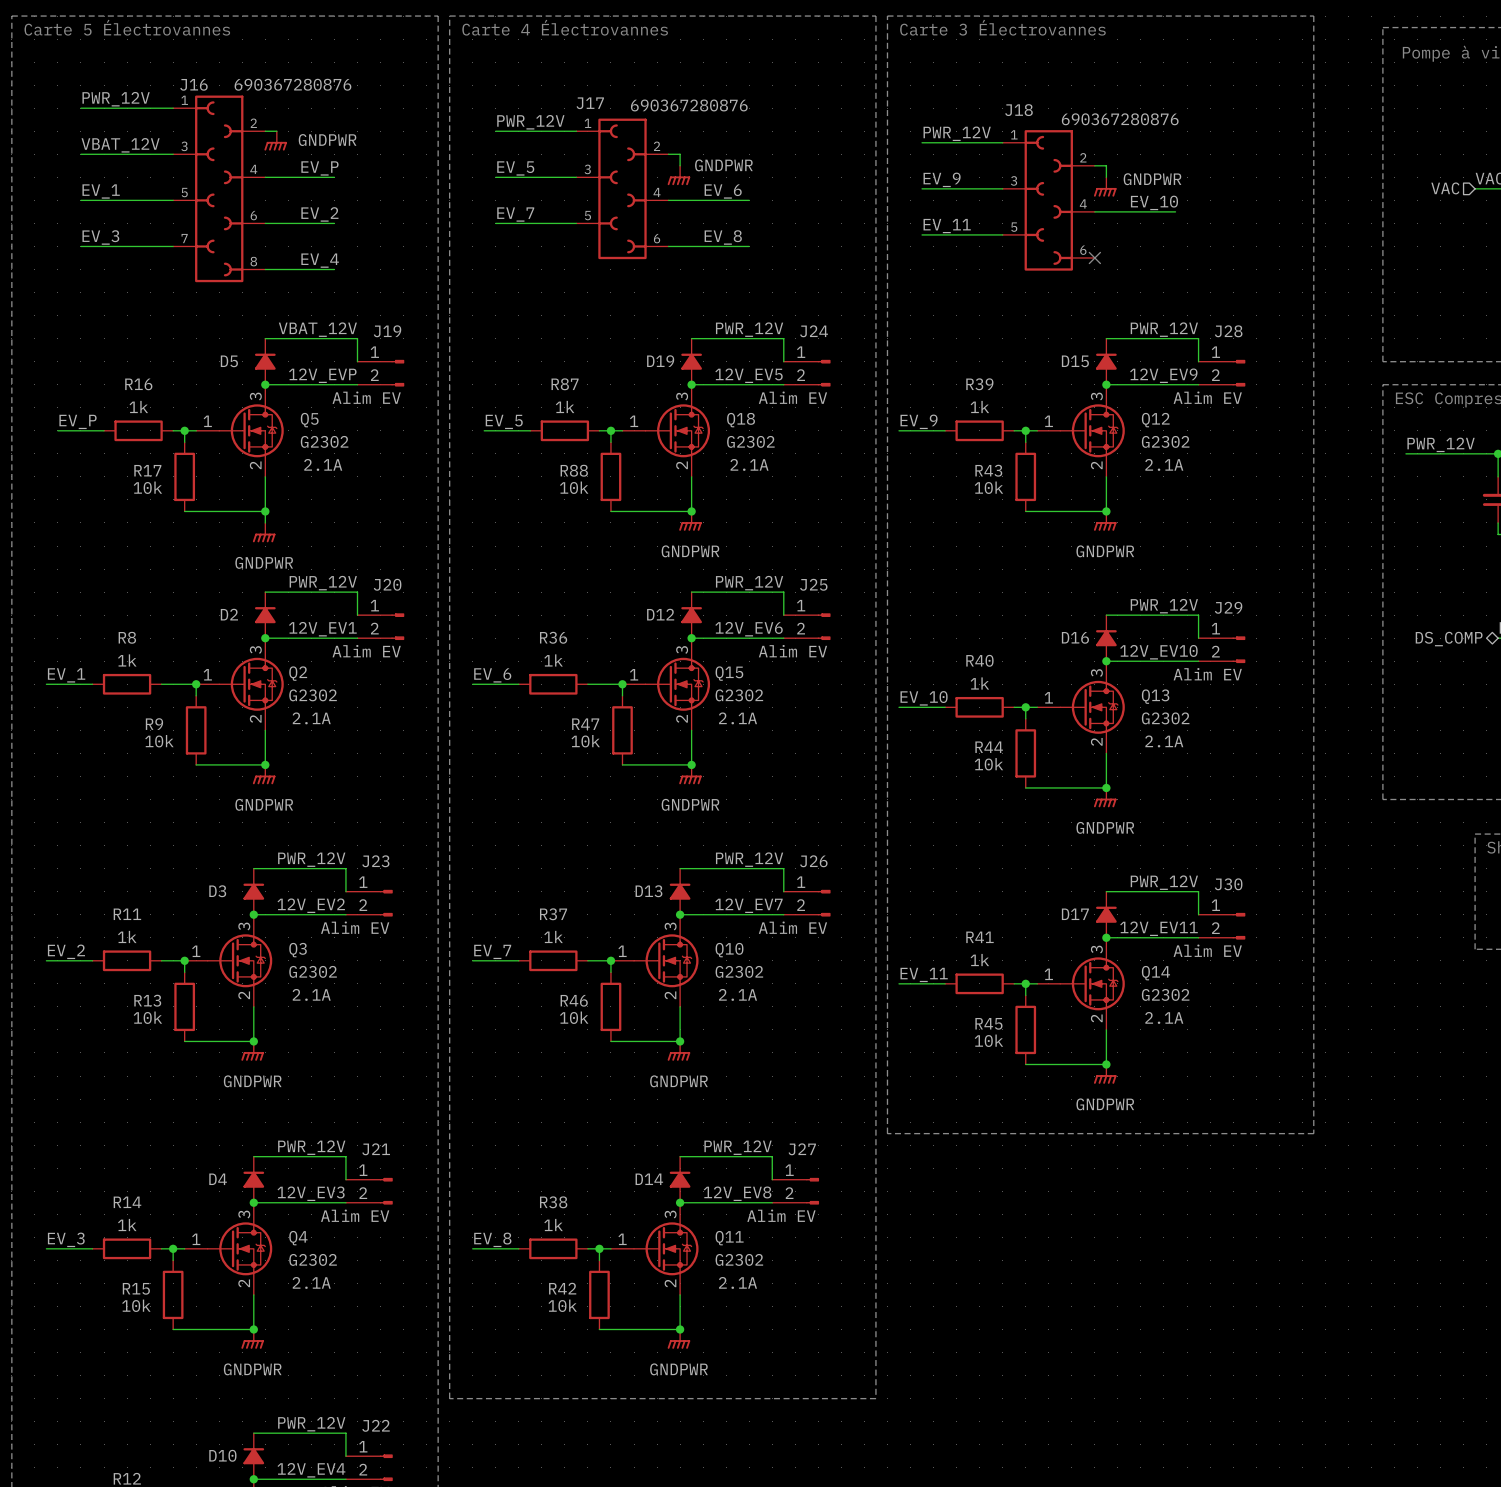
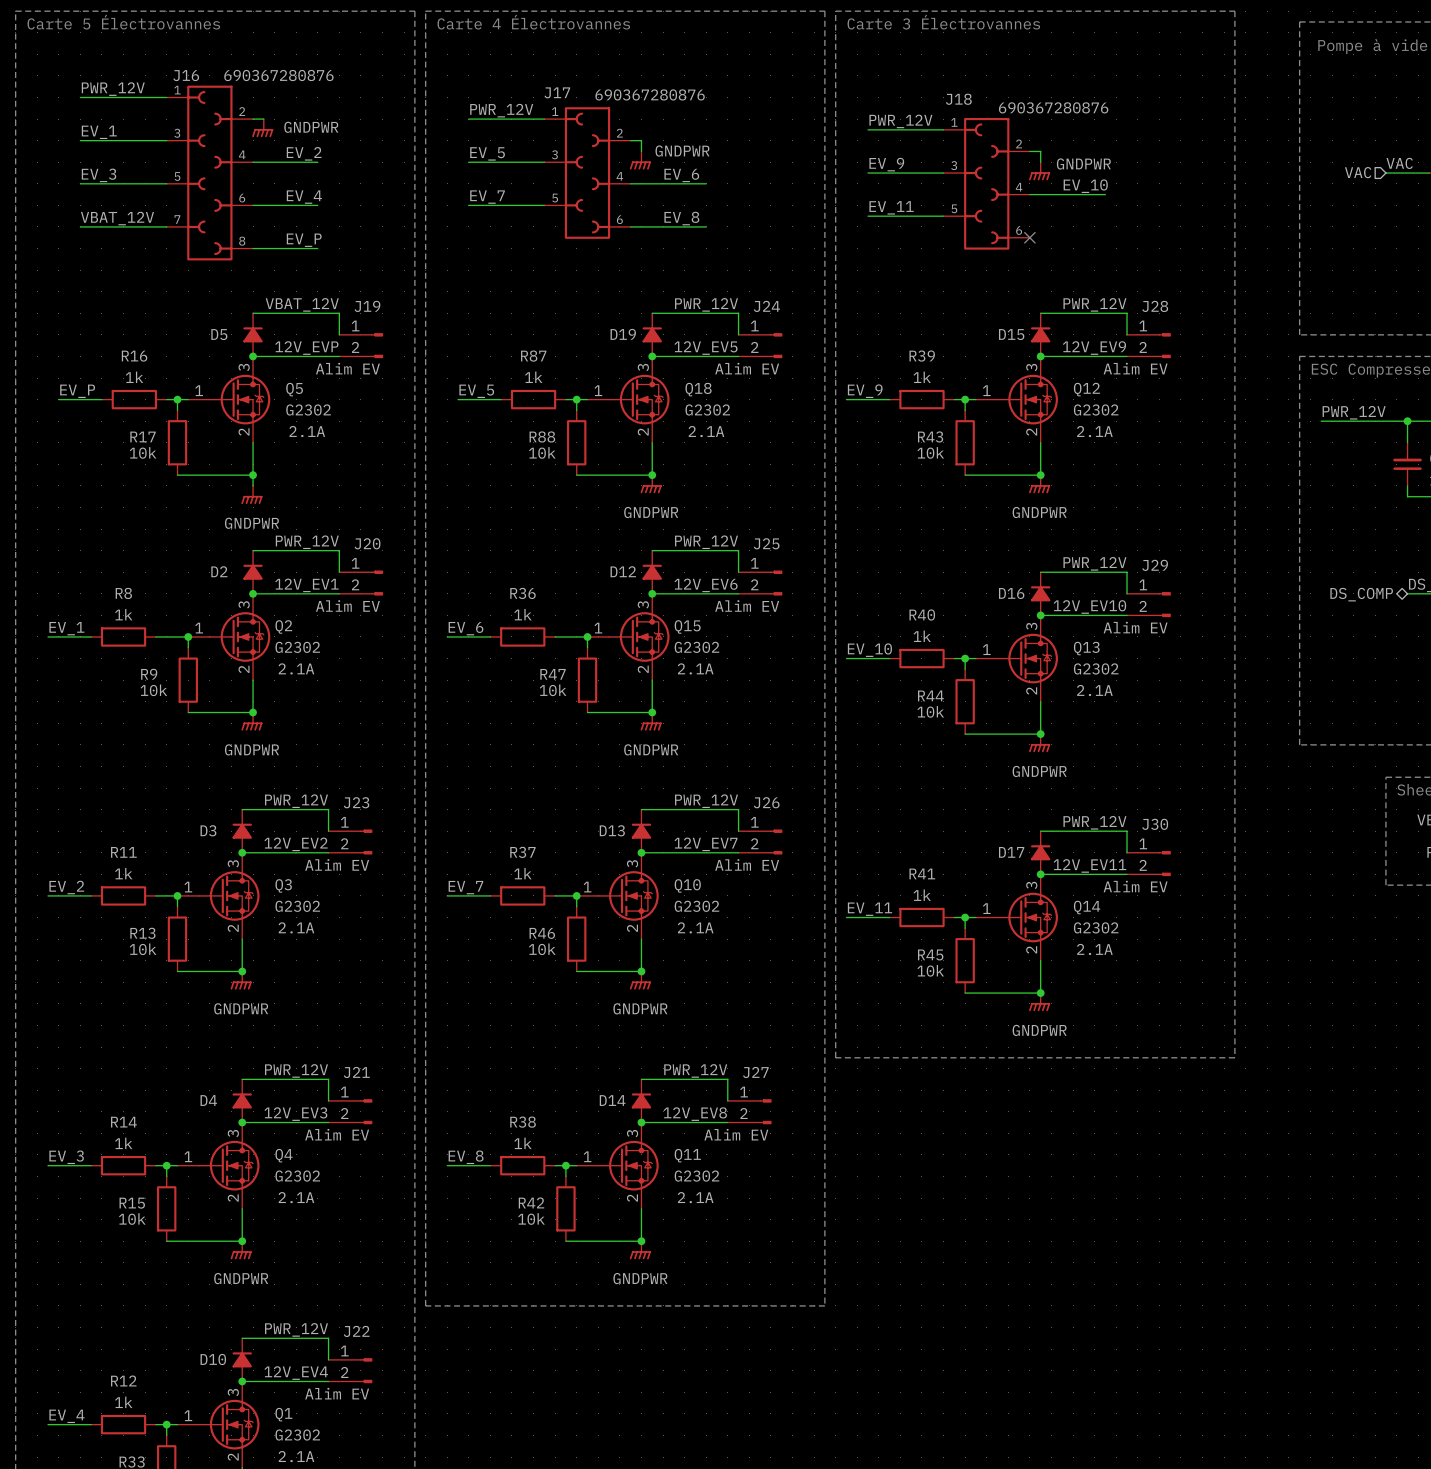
label: VBAT_12V (120, 145) -> EV_1 (99, 132)
label: EV_P (319, 168) -> EV_2 (304, 153)
label: EV_1 (101, 191) -> EV_3 (99, 175)
label: EV_2 (319, 214) -> EV_4 (304, 197)
label: EV_3 (100, 237) -> VBAT_12V (117, 218)
label: EV_4 (320, 260) -> EV_P (304, 240)

